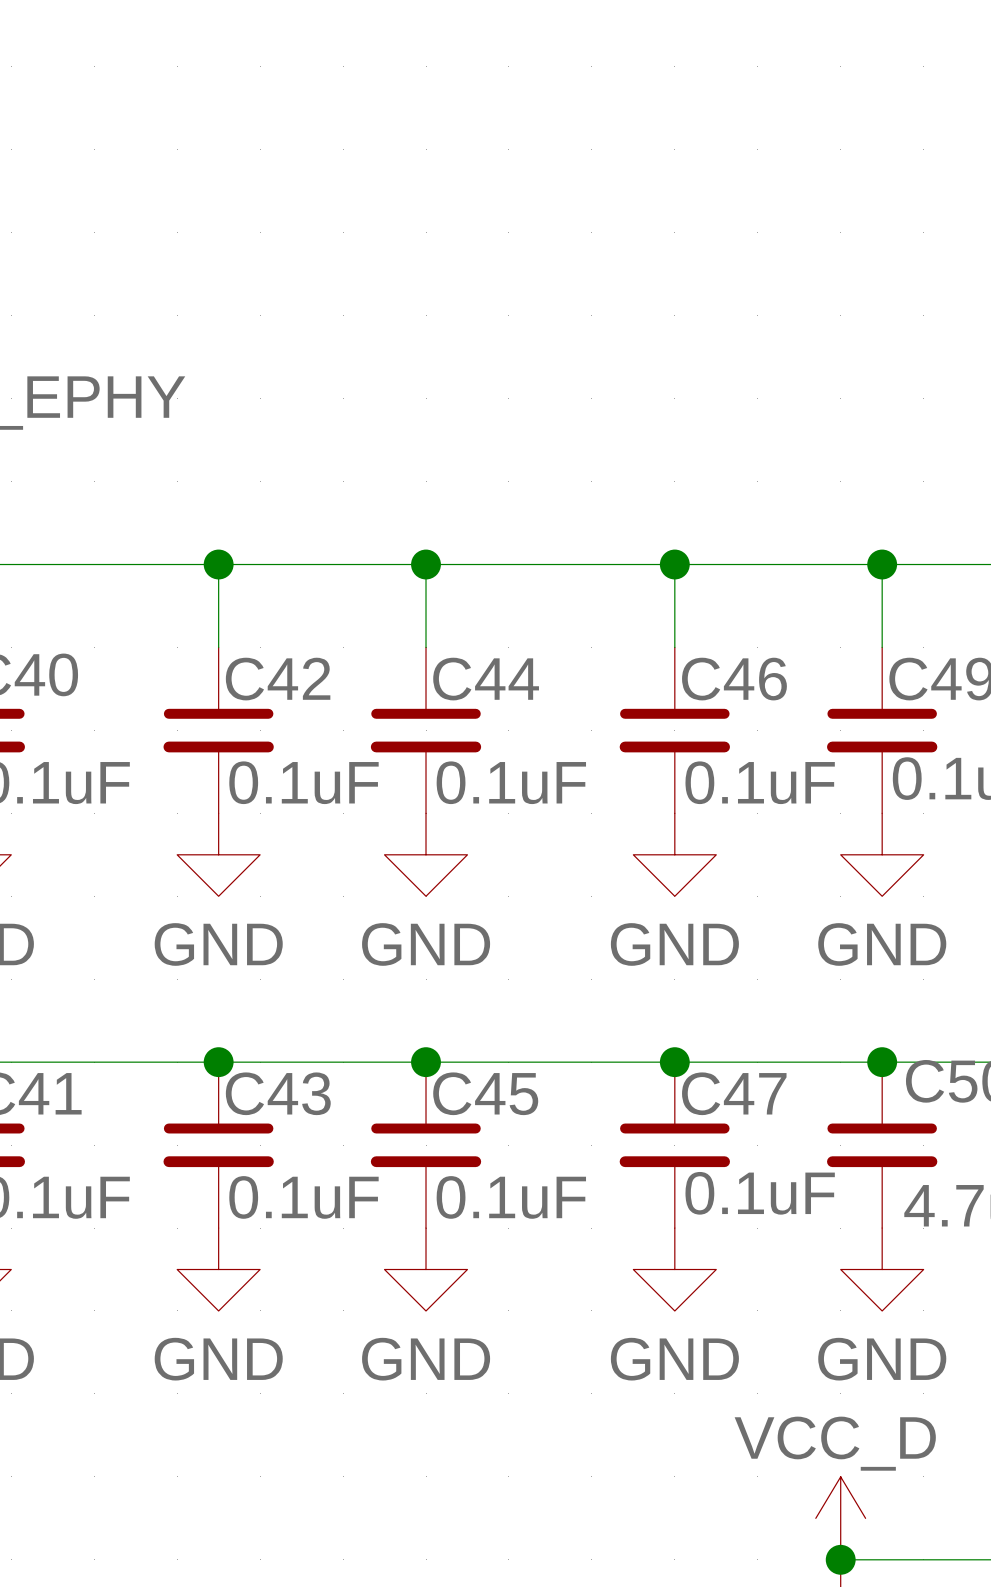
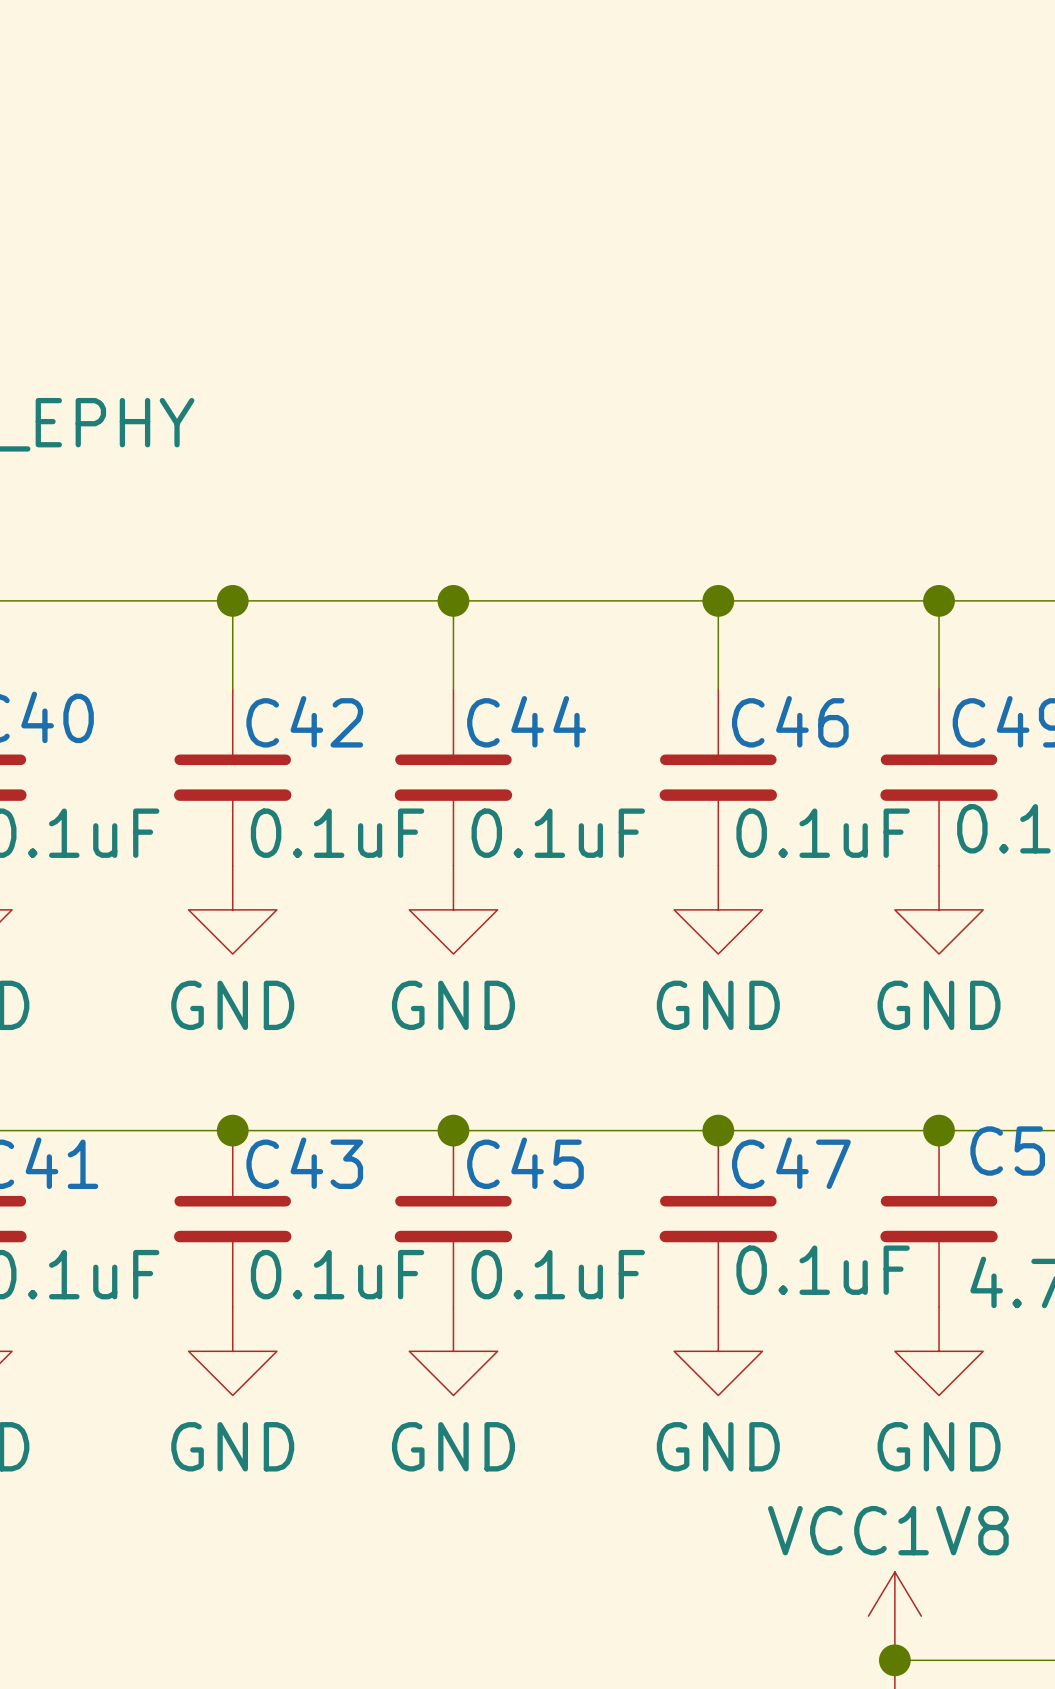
power symbol: VCC_D (840, 1518) -> VCC1V8 (894, 1616)

